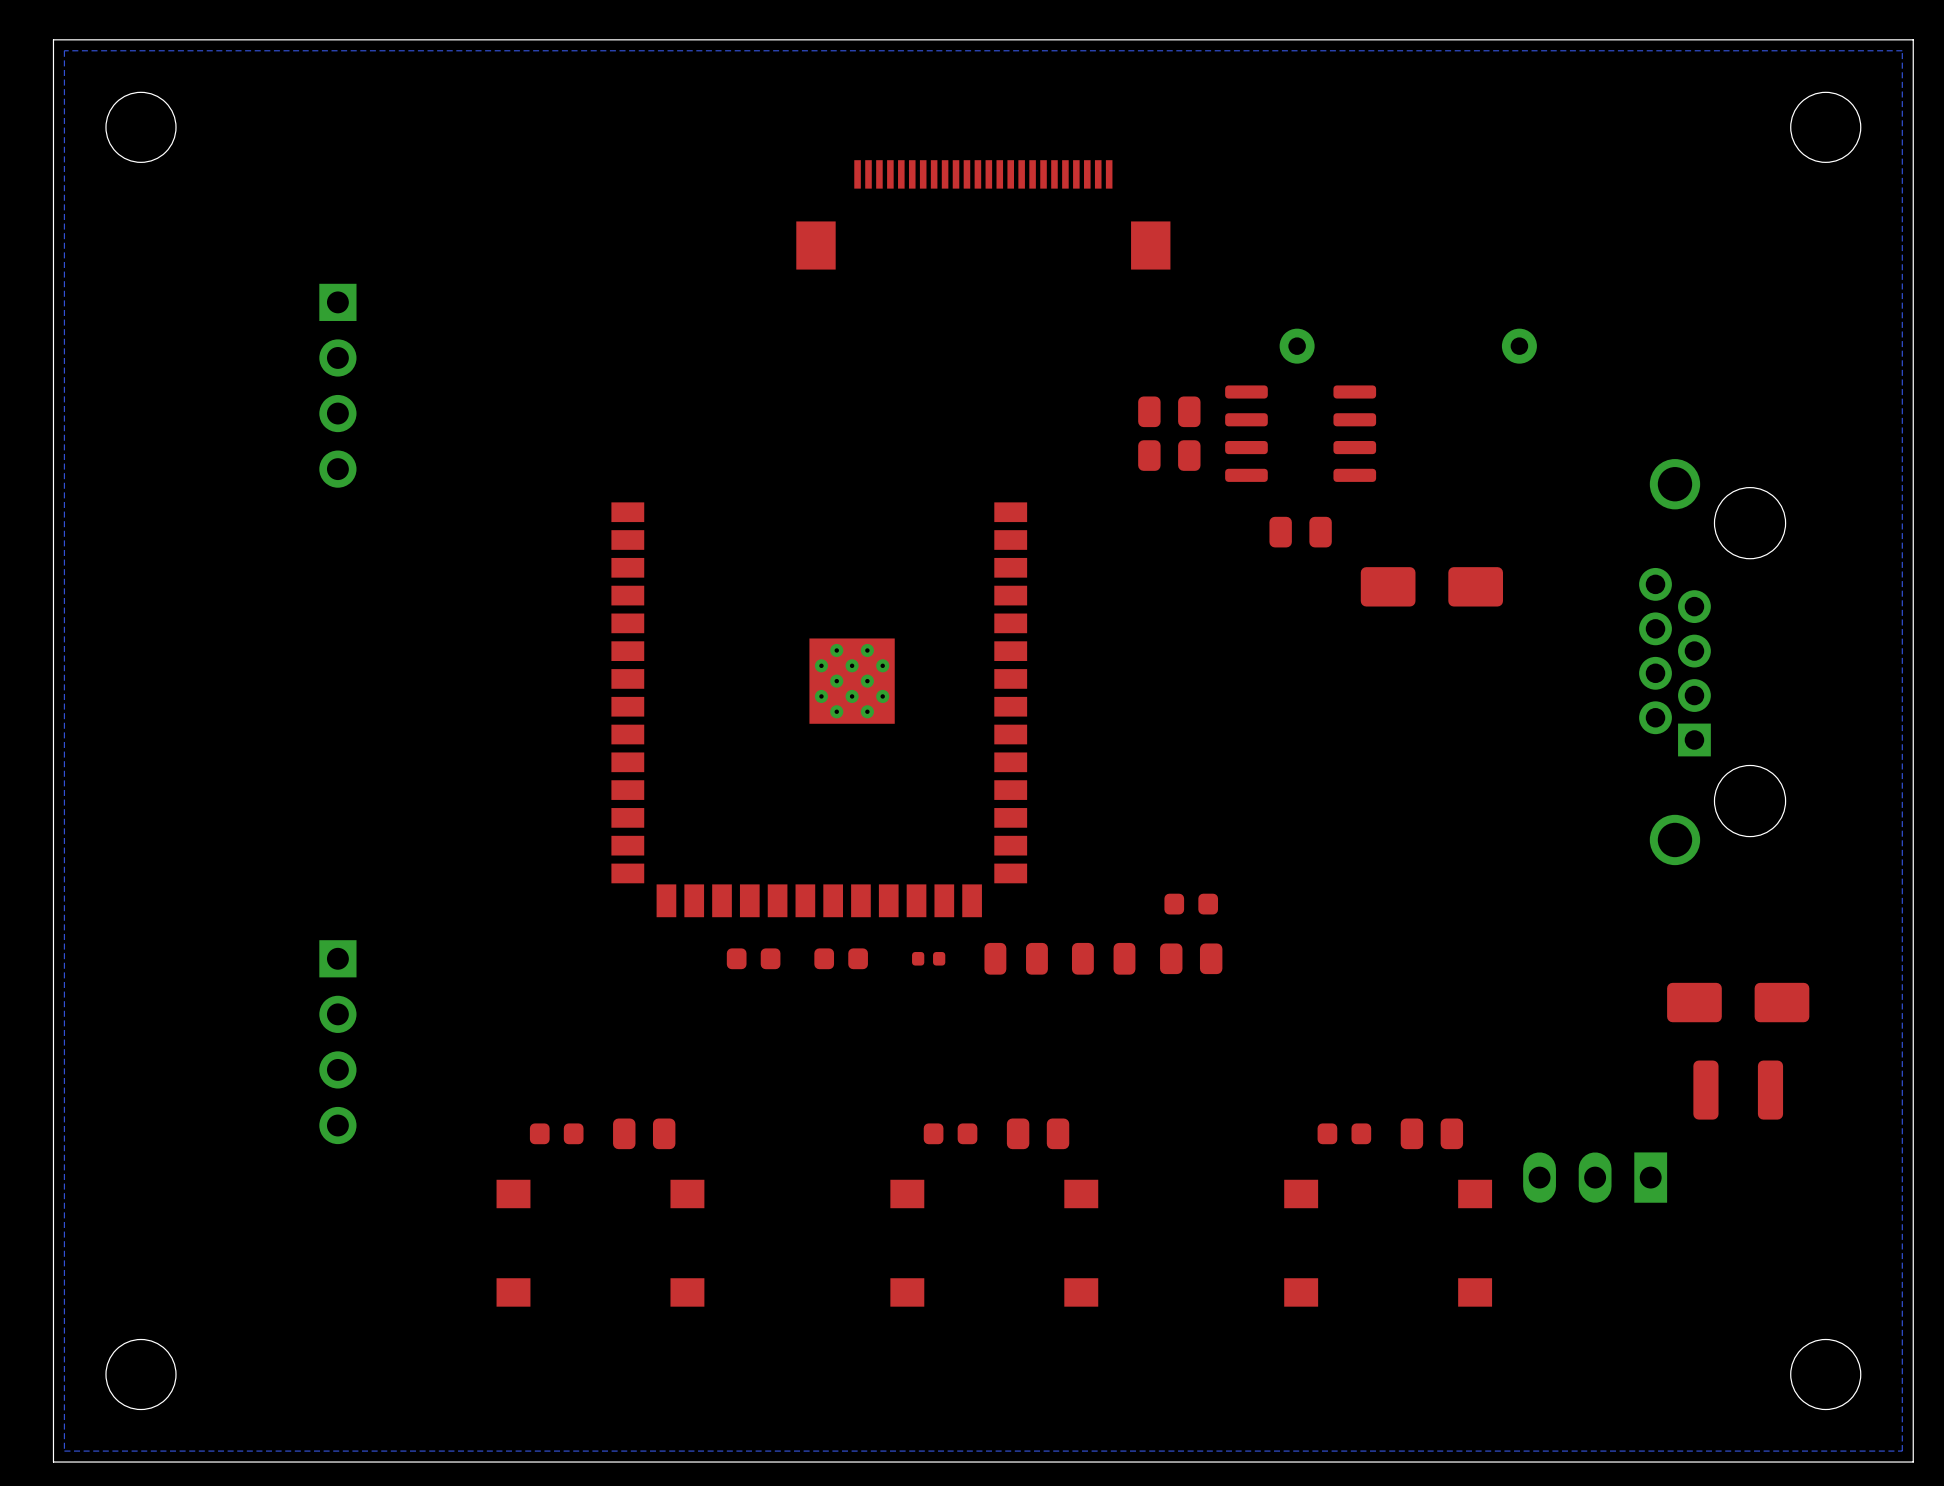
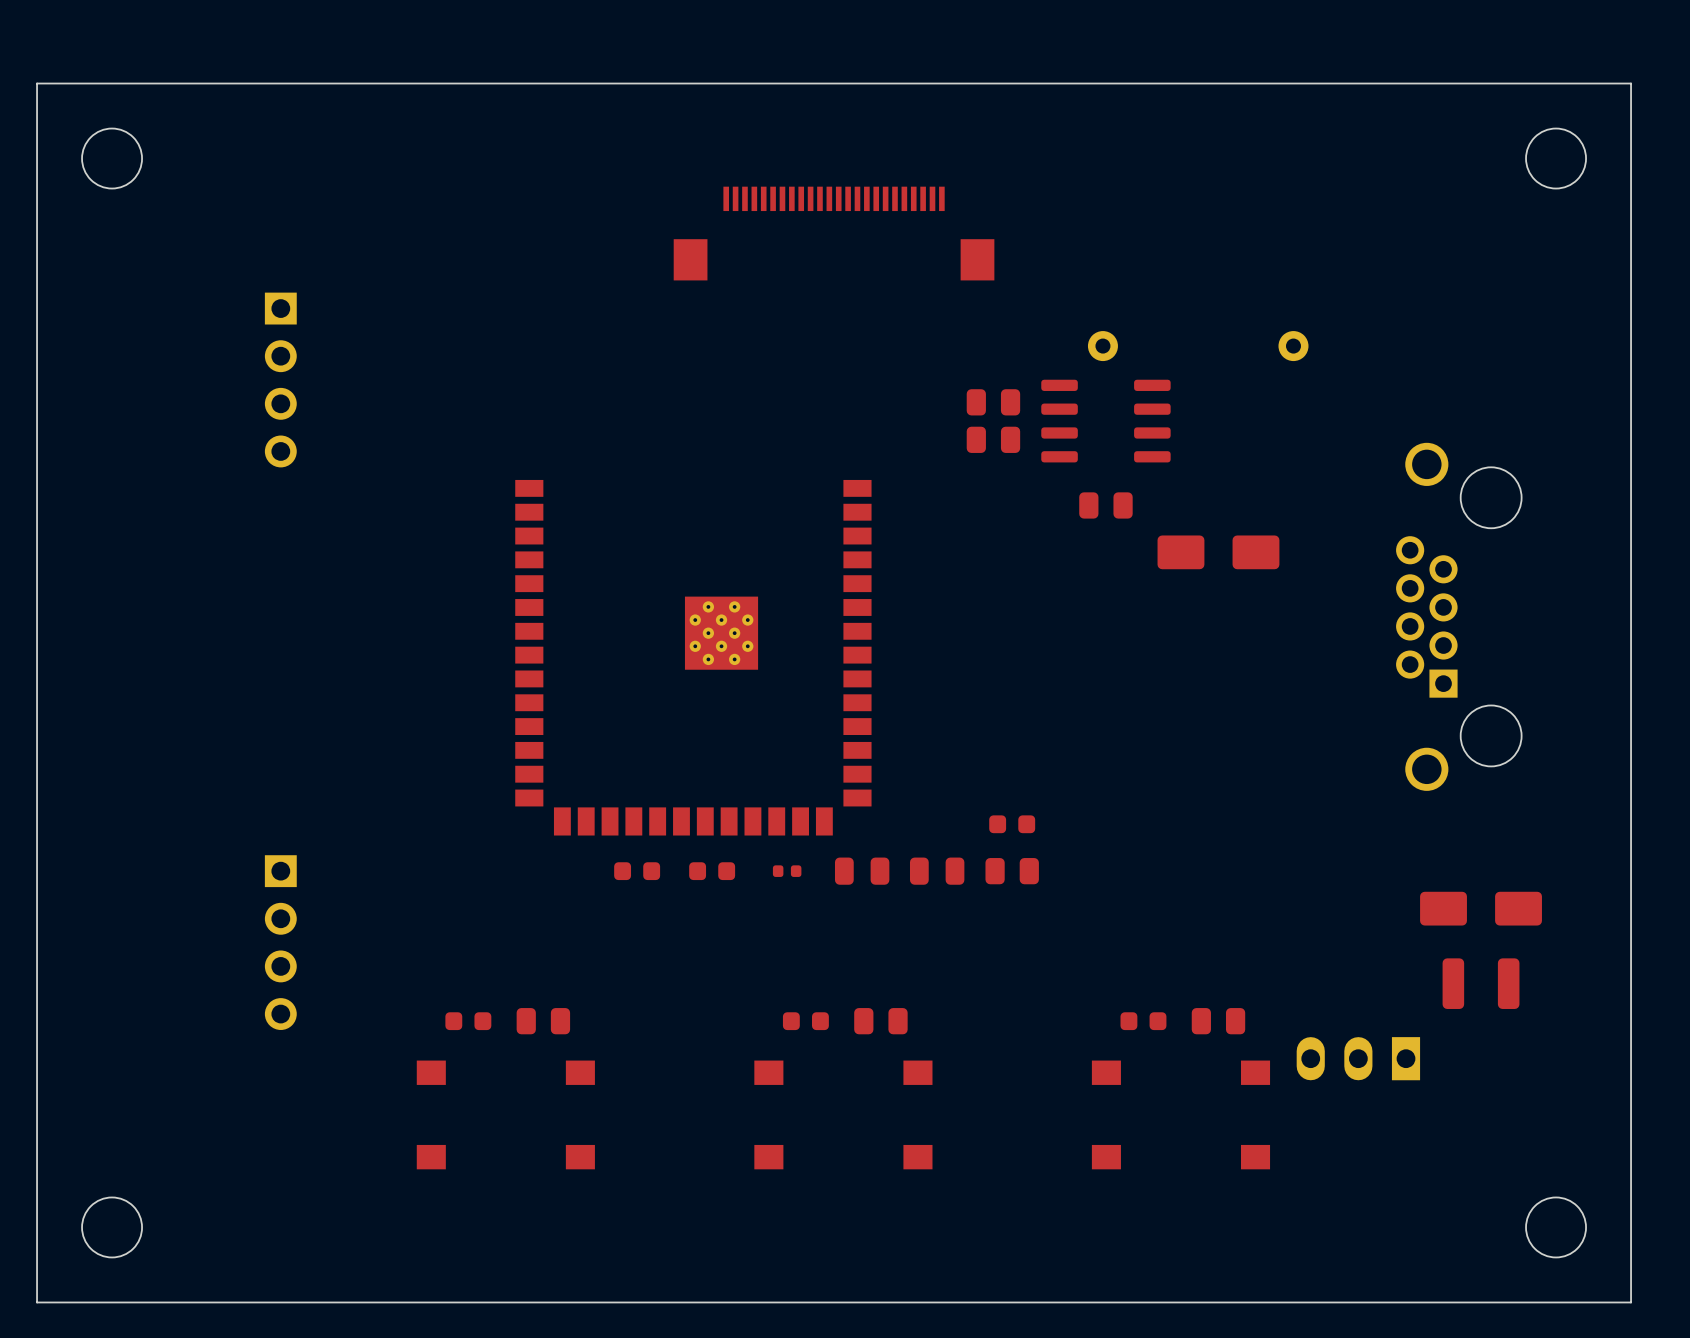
bottom zone outline: (1902, 50) (64, 50) (64, 1451) (1902, 1451) (1902, 50) -> none

